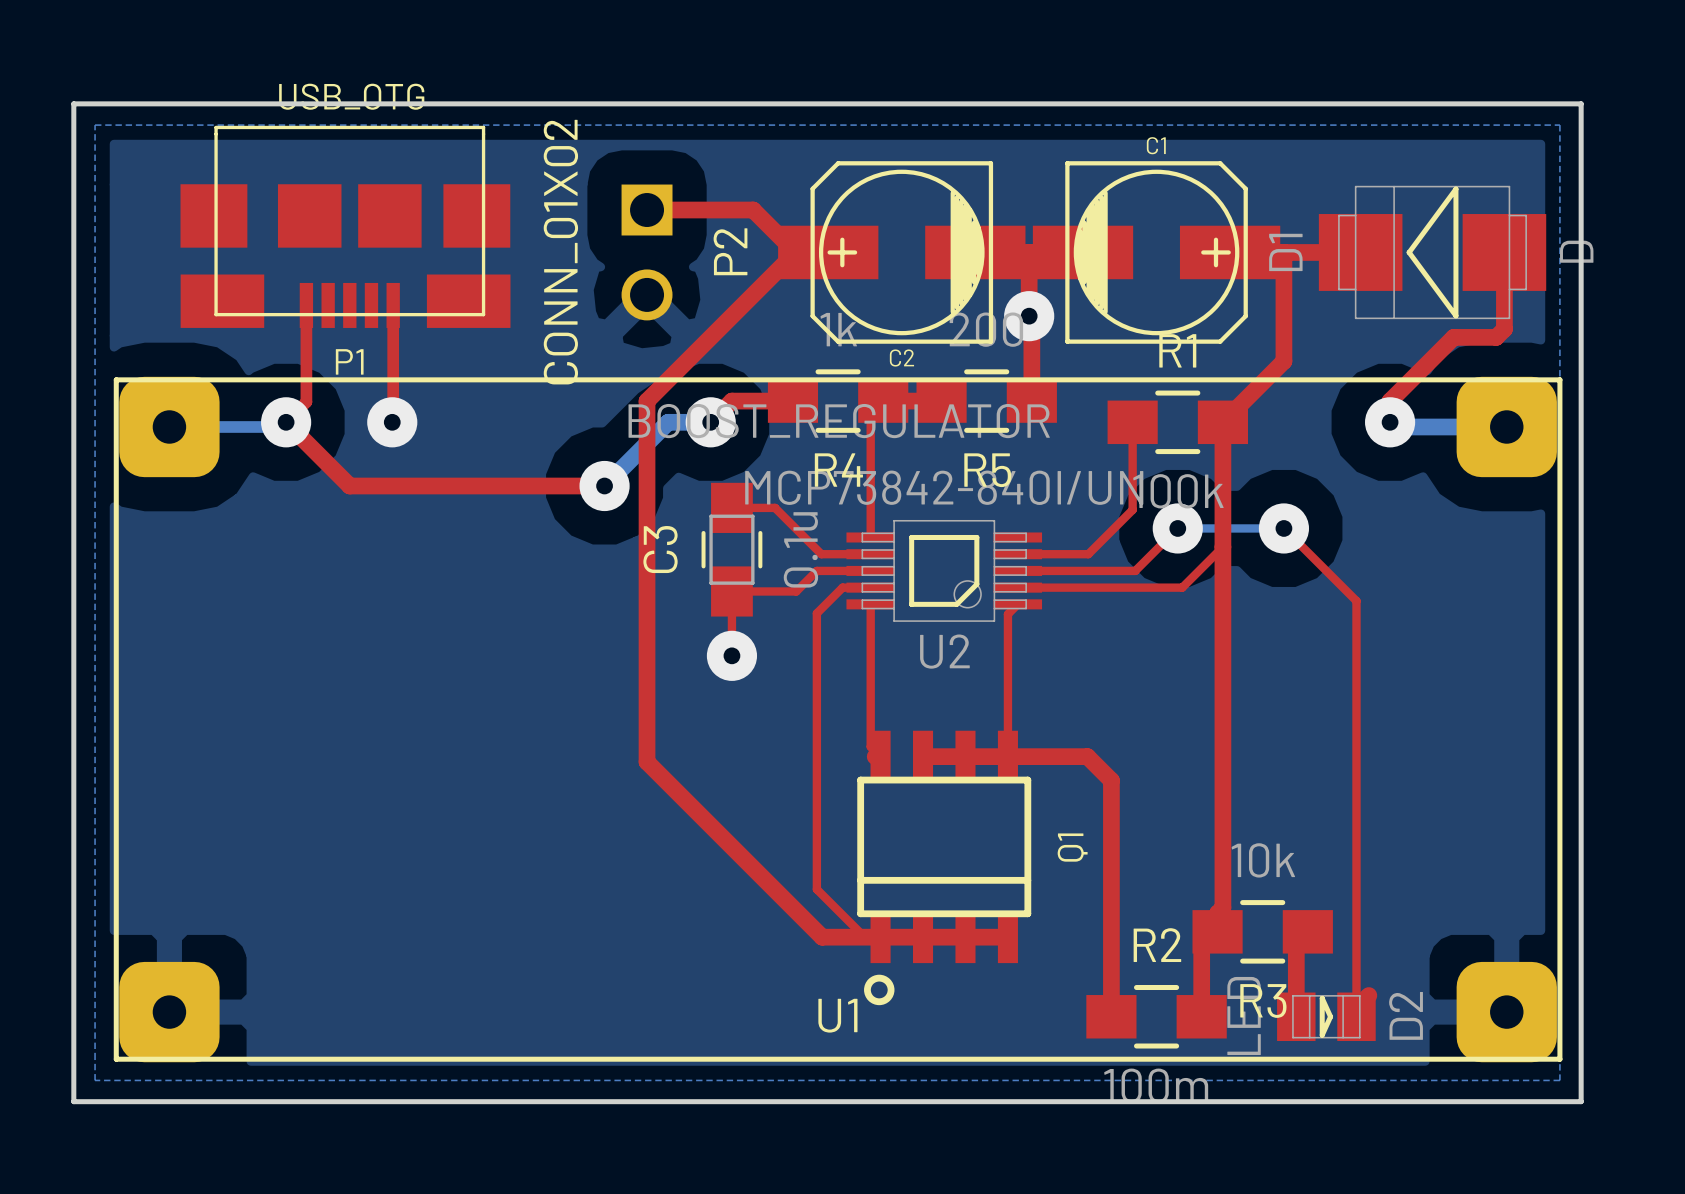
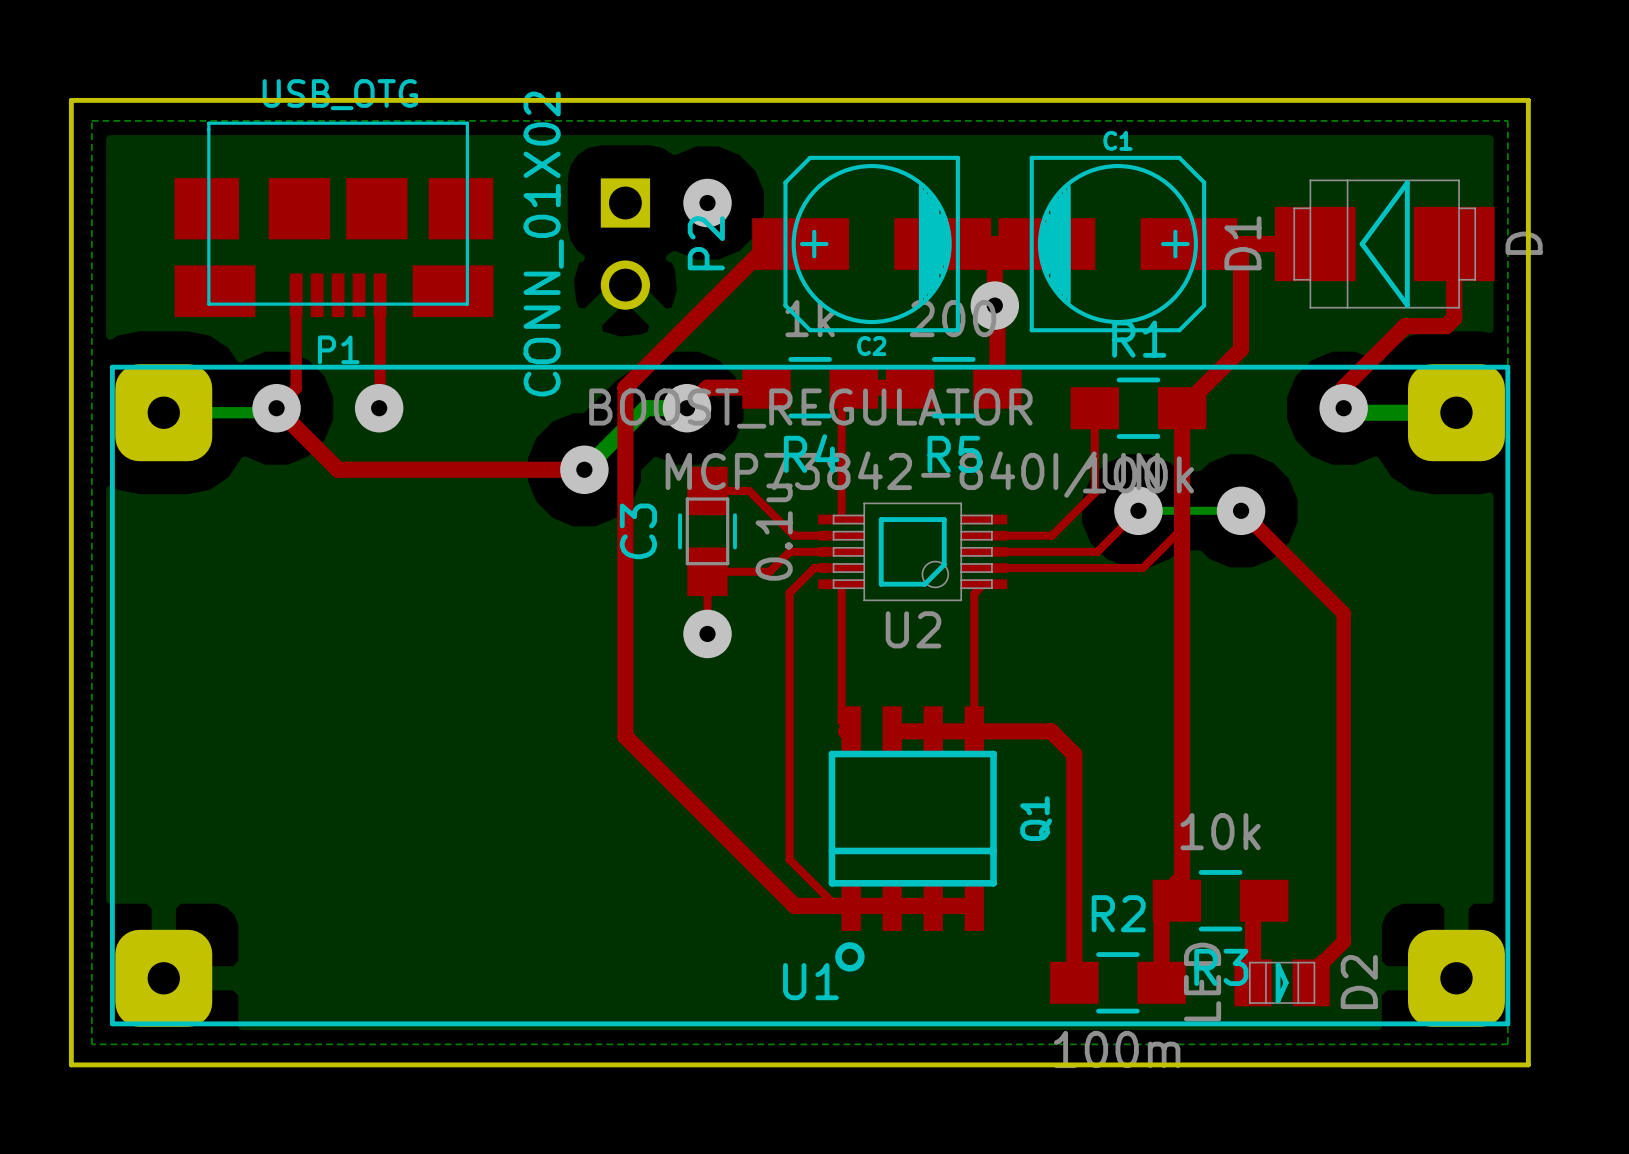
top track: (647, 210) (753, 210) (795, 252) -> none
via: none -> (707, 203)
top track width: thin (1283, 528) (1356, 601) -> thick (1241, 510) (1311, 580)
top track: (1356, 601) (1356, 1007) -> (1311, 580) (1343, 613) (1343, 941) (1311, 974)

